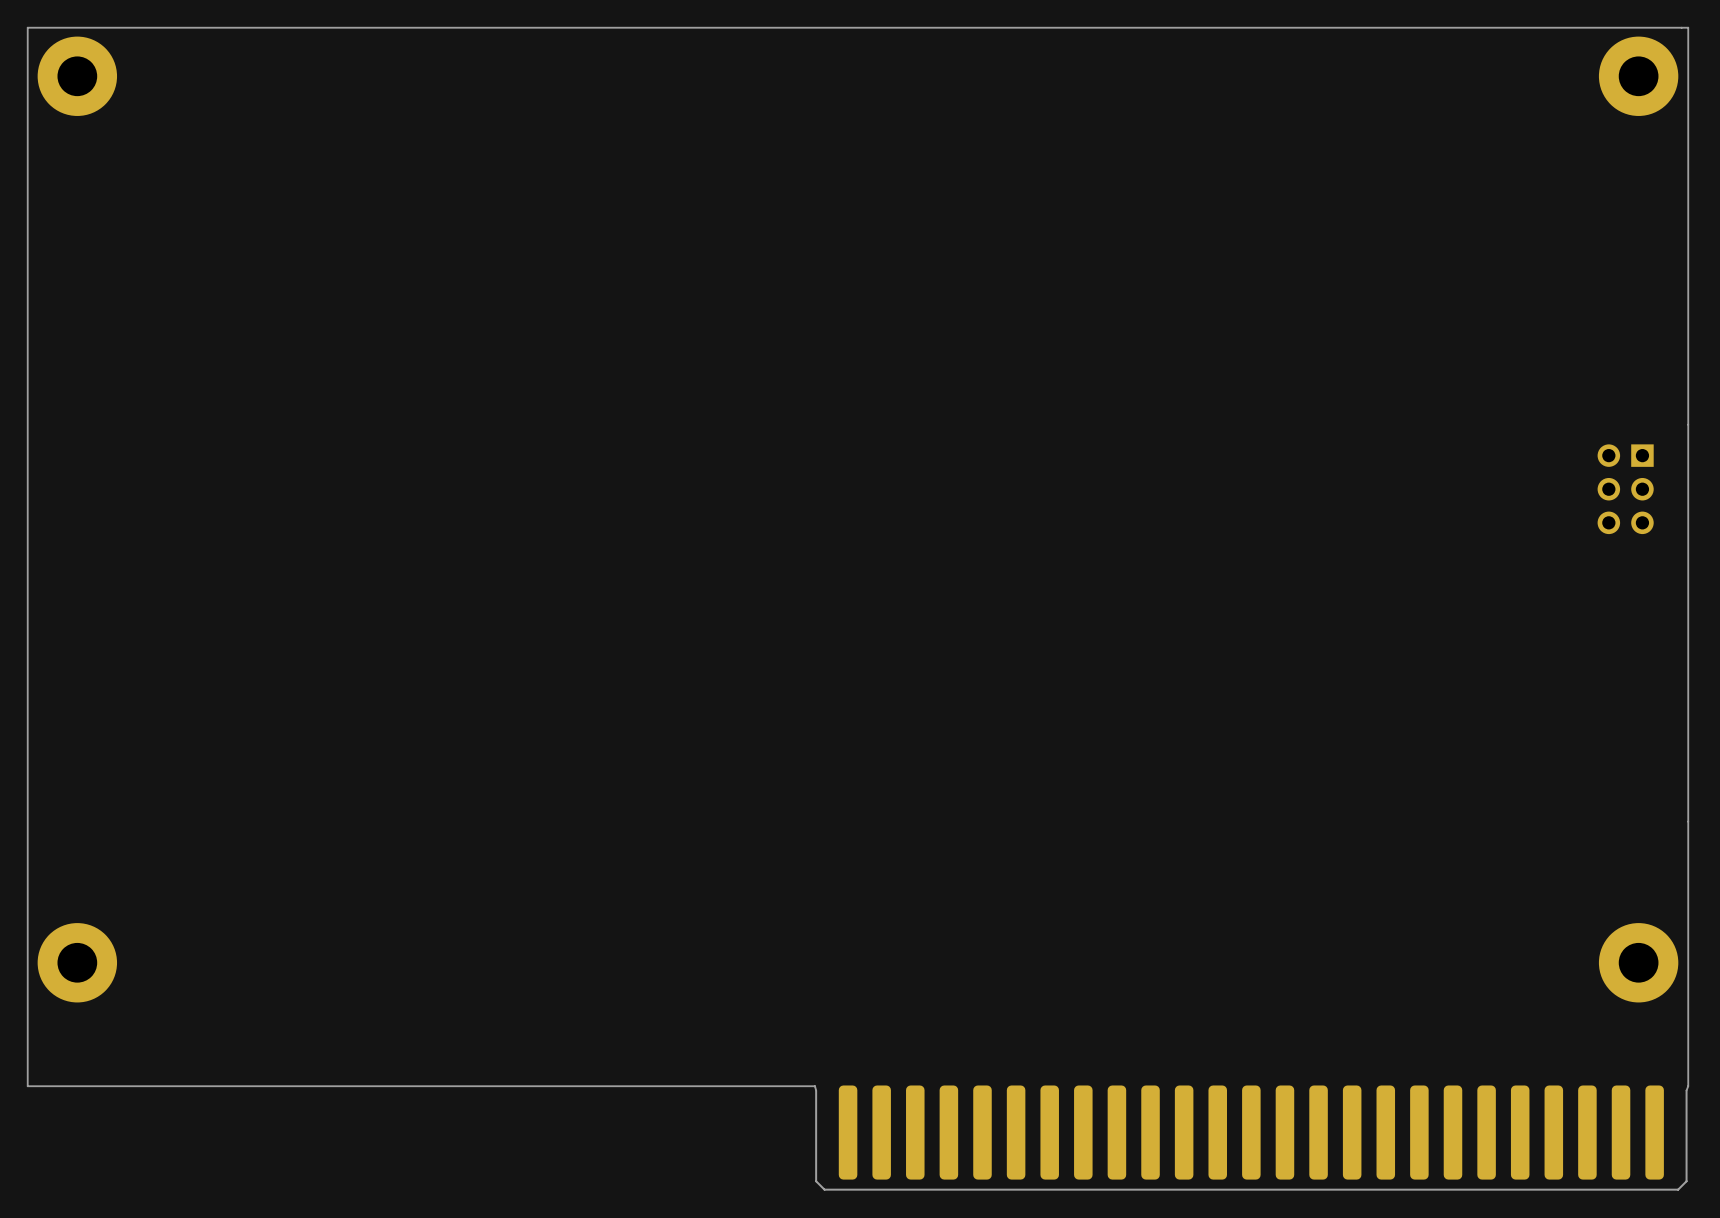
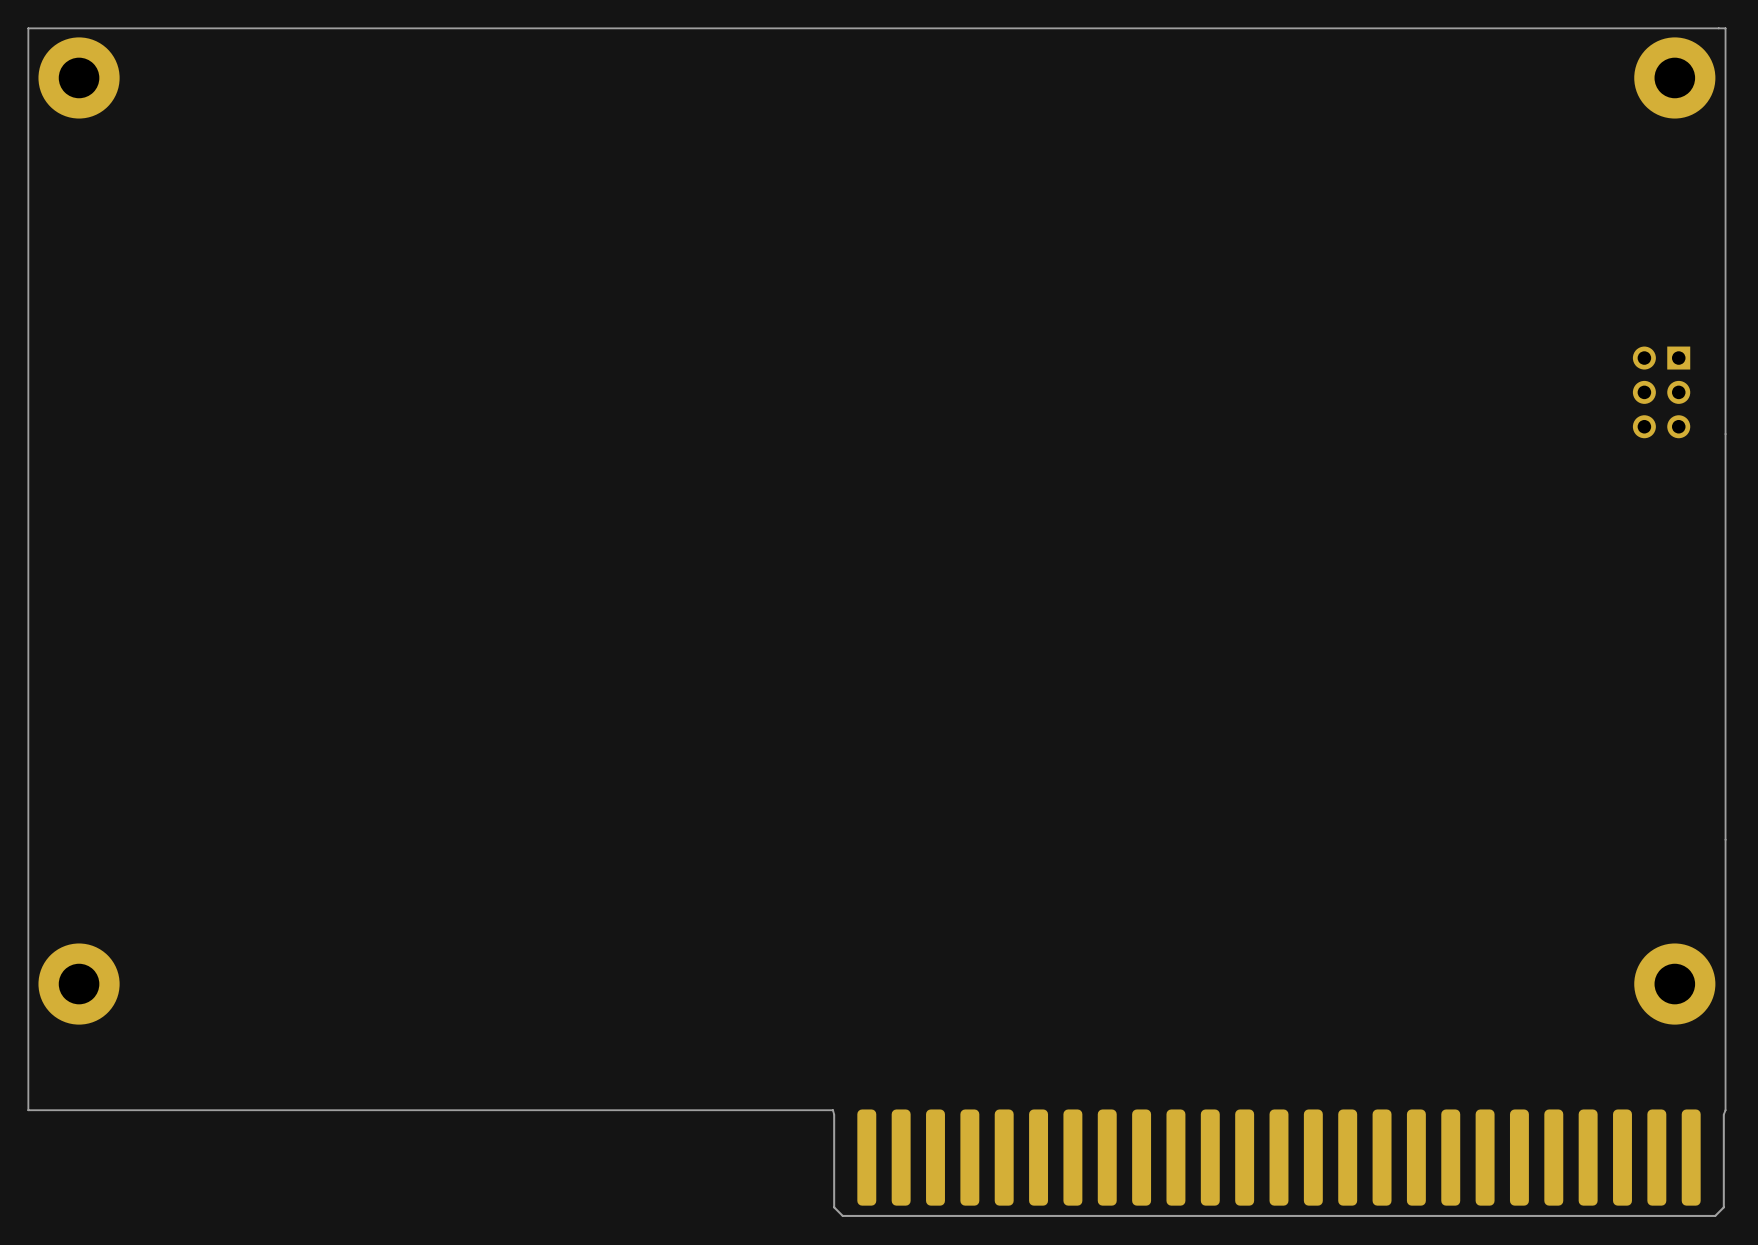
part position: (1625, 489) -> (1661, 392)

